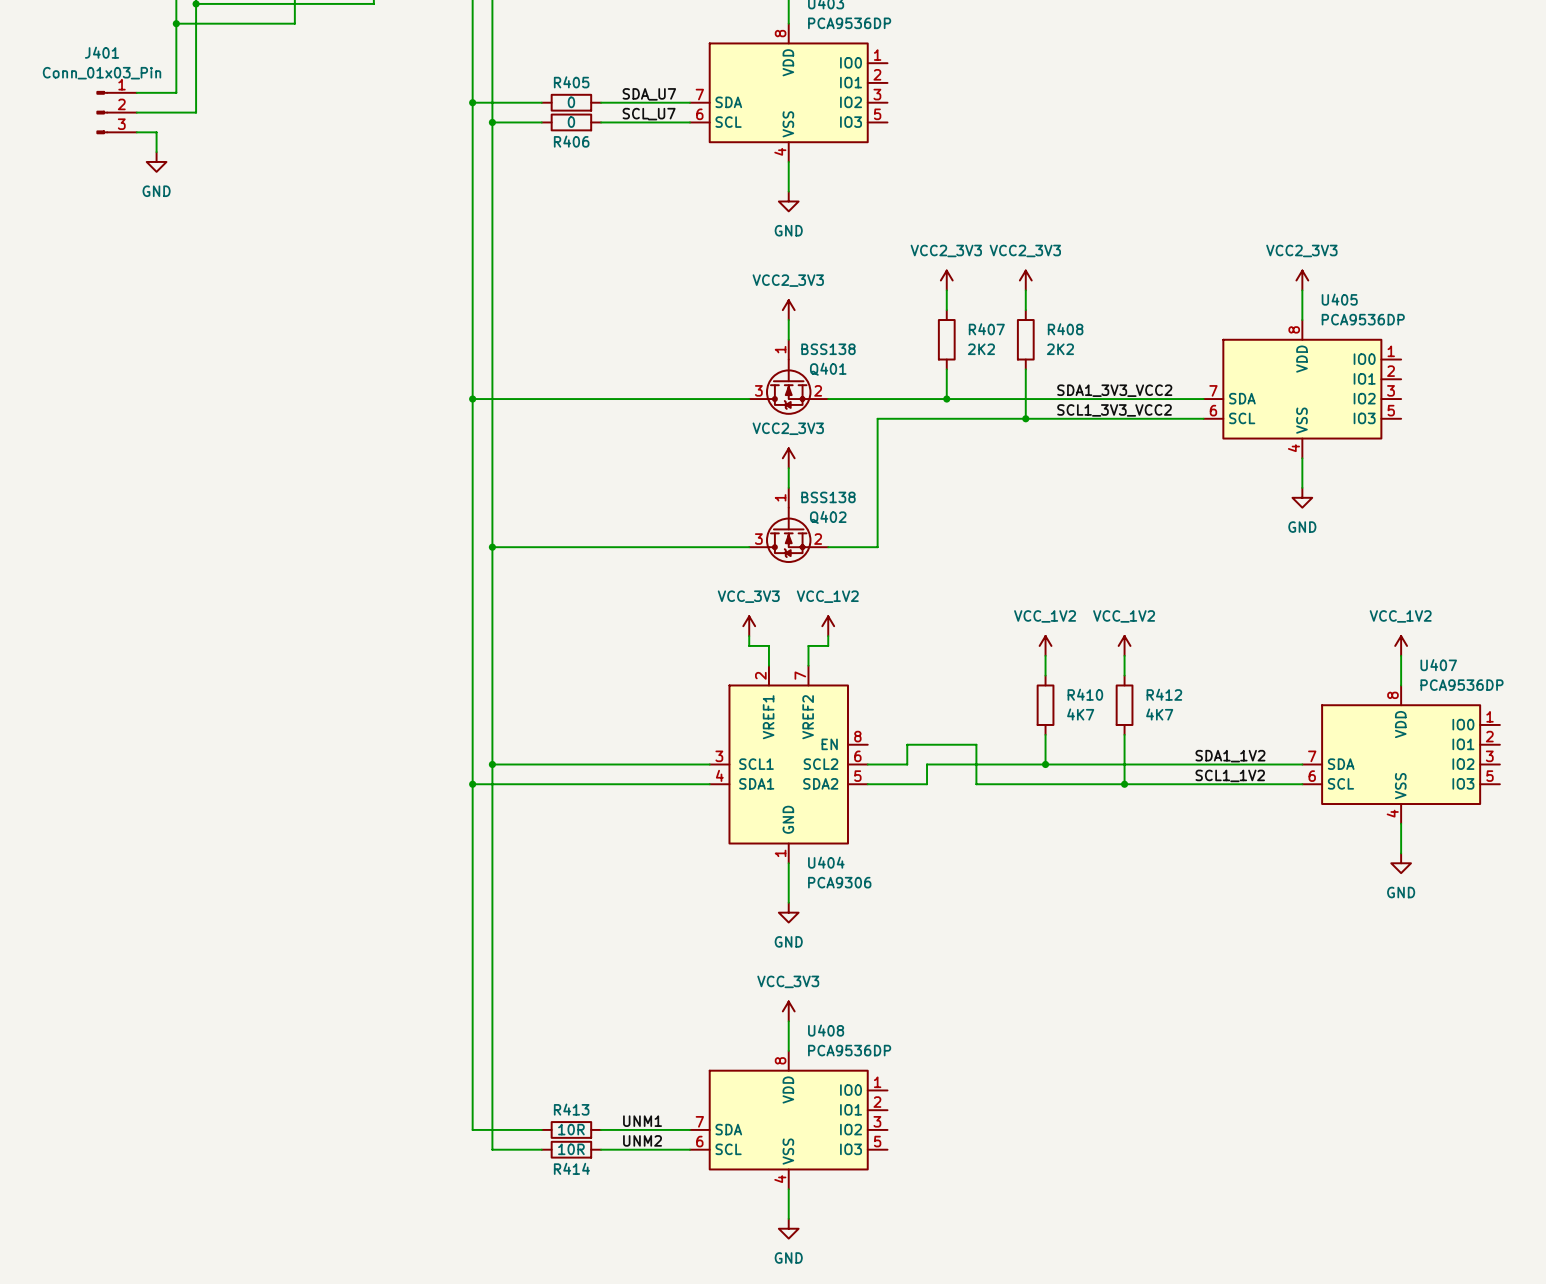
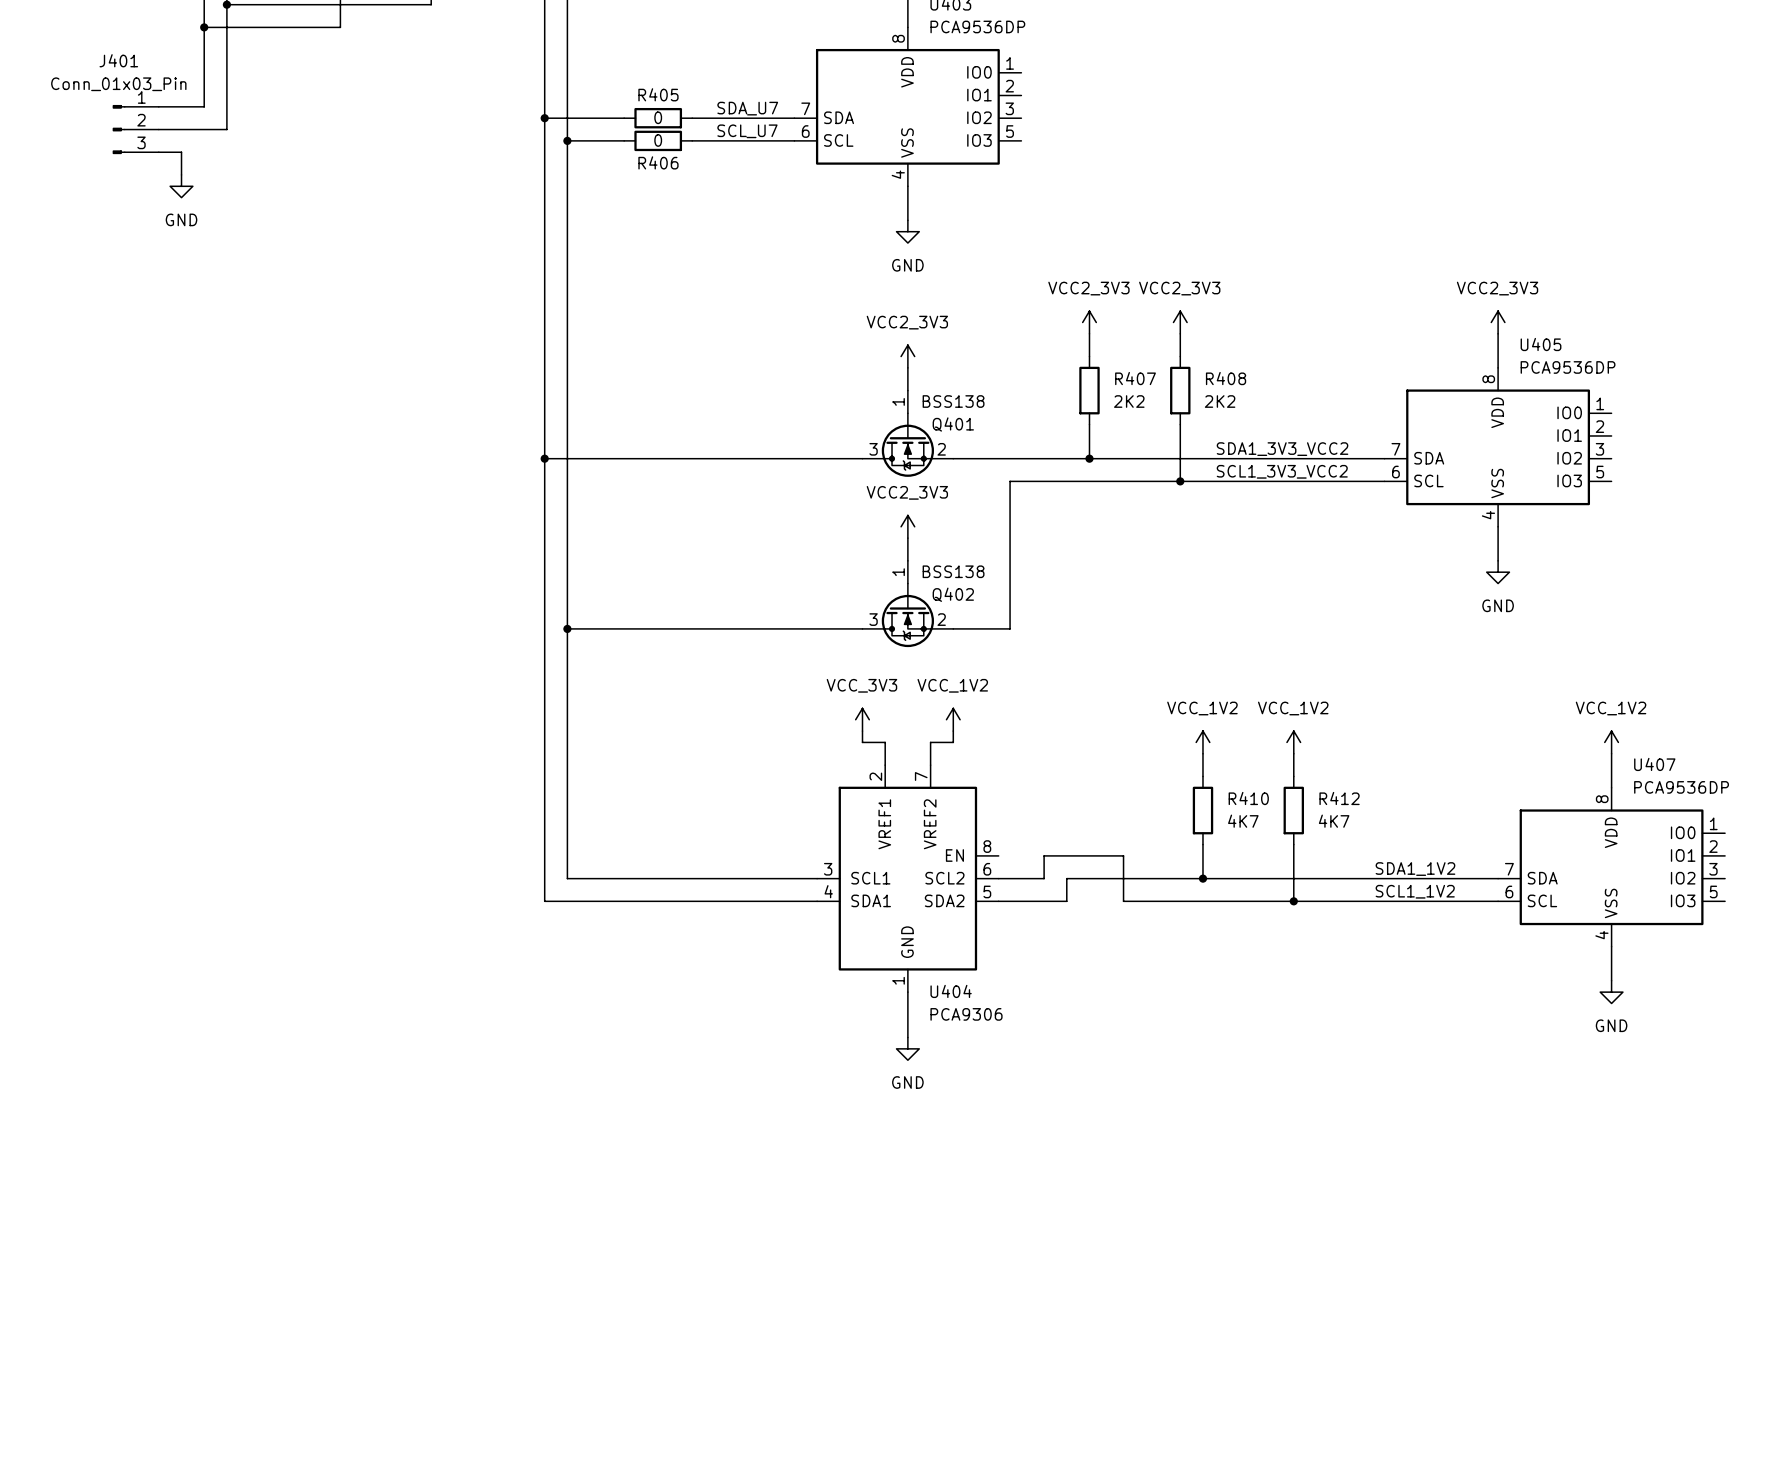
wire: (492, 764) (492, 1149) (541, 1149) -> none
junction: (492, 764) -> none
wire: (472, 784) (472, 1129) (541, 1129) -> none
junction: (472, 784) -> none
power symbol: VCC_3V3 (788, 1011) -> none
wire: (788, 1021) (788, 1050) -> none
U408: PCA9536DP (788, 1120) -> none
label: UNM1 (642, 1121) -> none
R413: 10R (571, 1129) -> none
wire: (601, 1129) (689, 1129) -> none
label: UNM2 (642, 1140) -> none
R414: 10R (571, 1149) -> none
wire: (601, 1149) (689, 1149) -> none
wire: (788, 1189) (788, 1218) -> none
power symbol: GND (788, 1228) -> none

